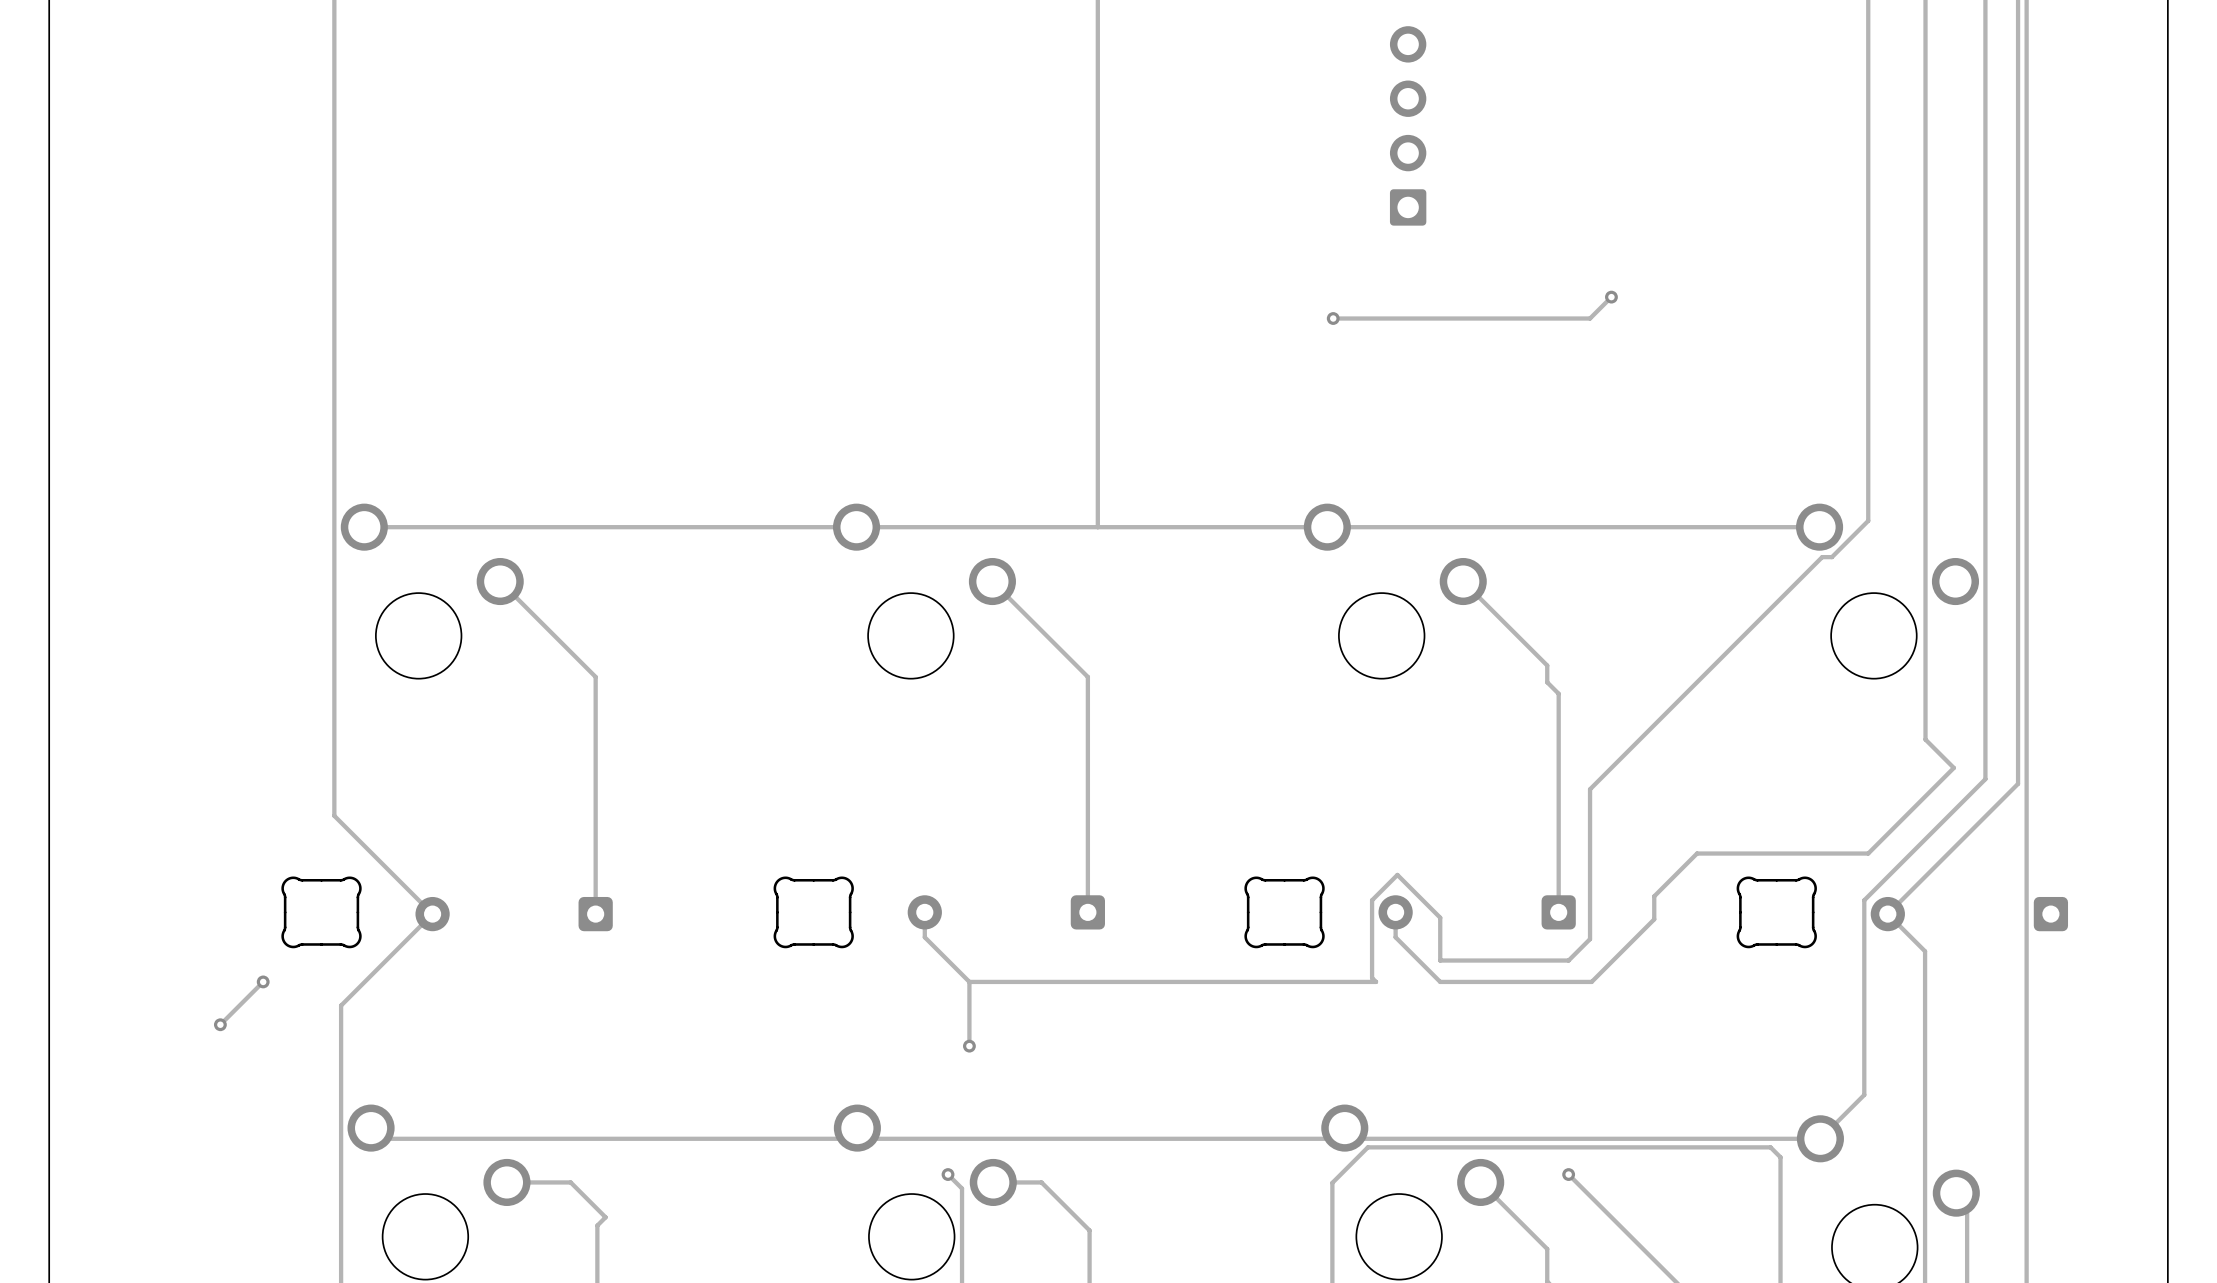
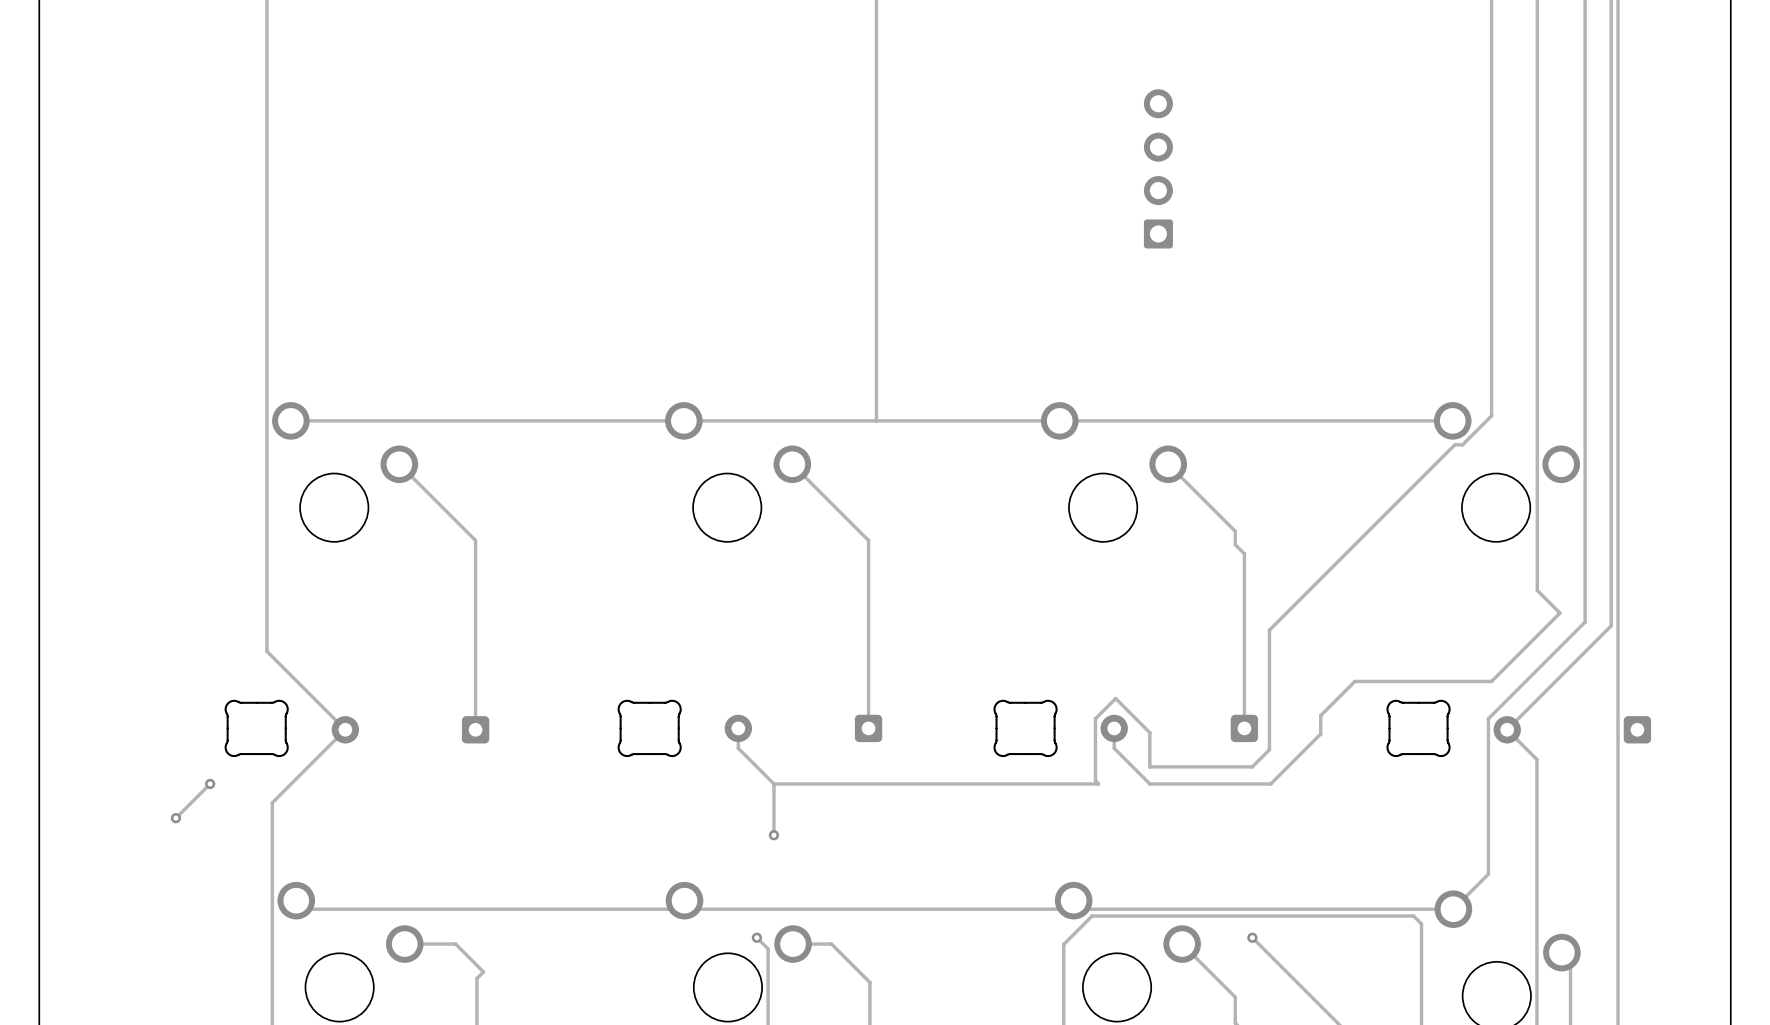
part position: (1408, 125) -> (1158, 168)
track: (1611, 297) (1590, 318) (1333, 318) -> none
via: (1611, 297) -> none
via: (1333, 318) -> none

